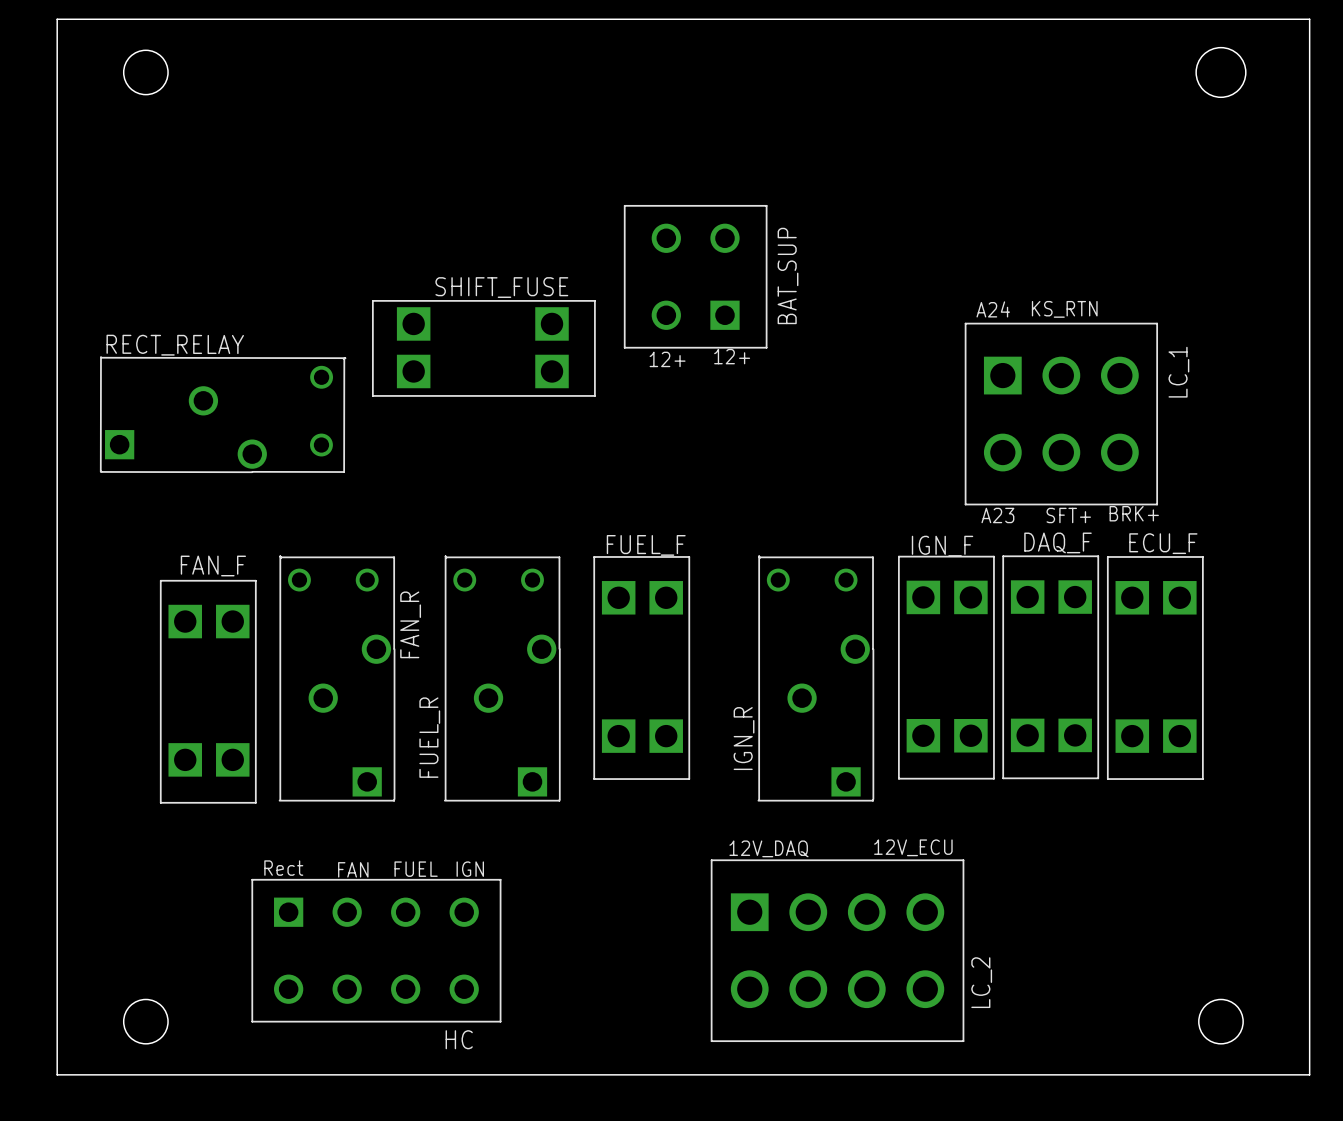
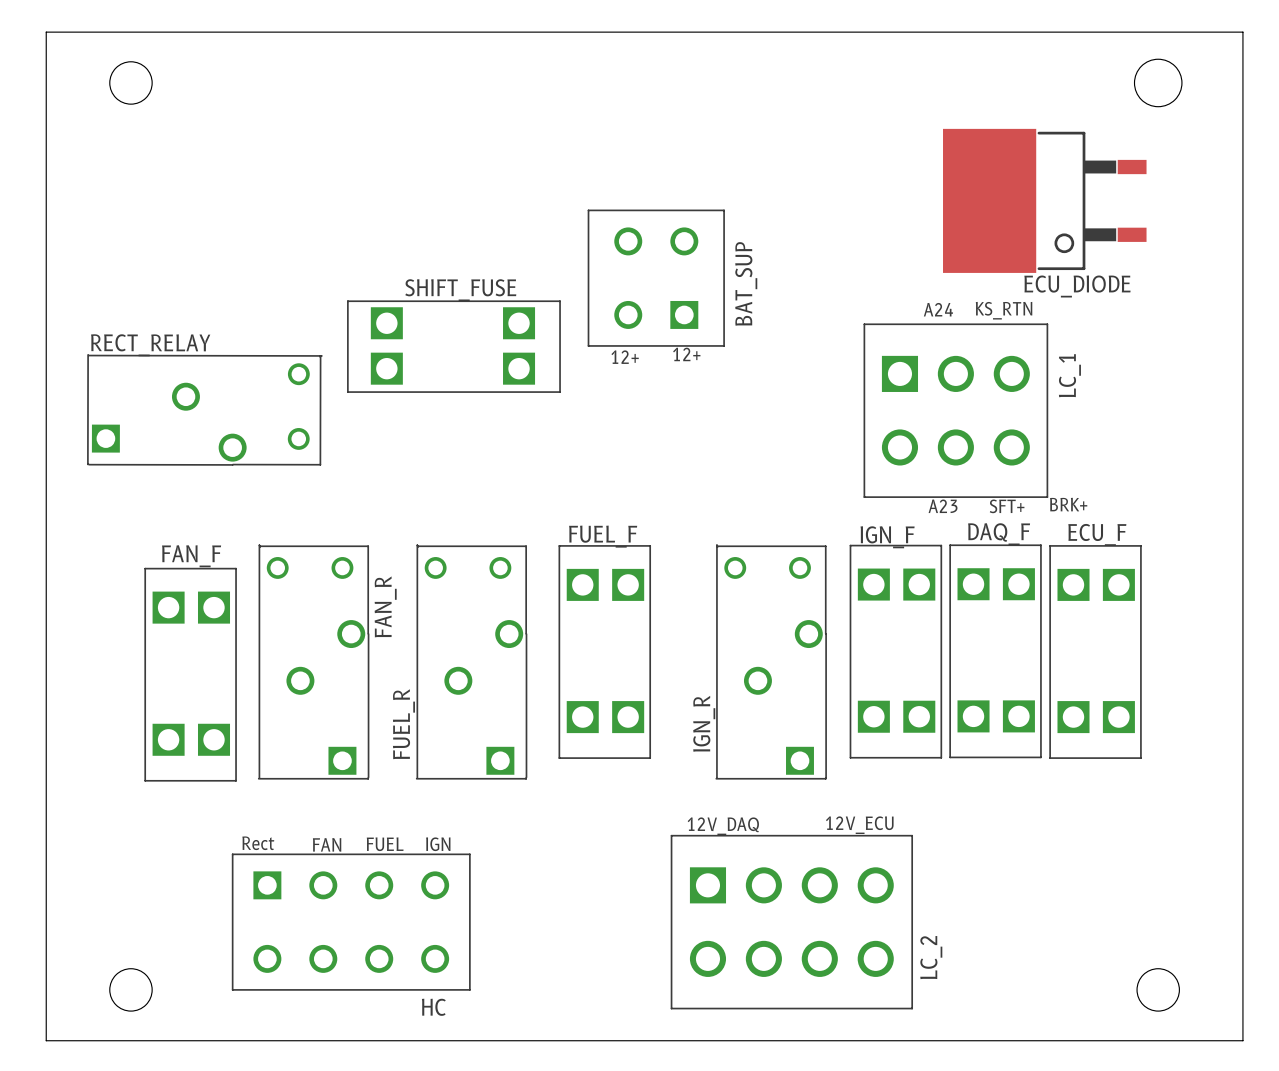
ECU_DIODE: none -> (1044, 200)
LC_1 position: (1061, 414) -> (955, 410)

